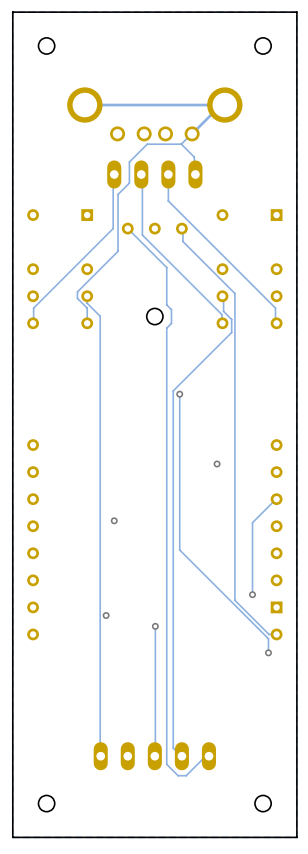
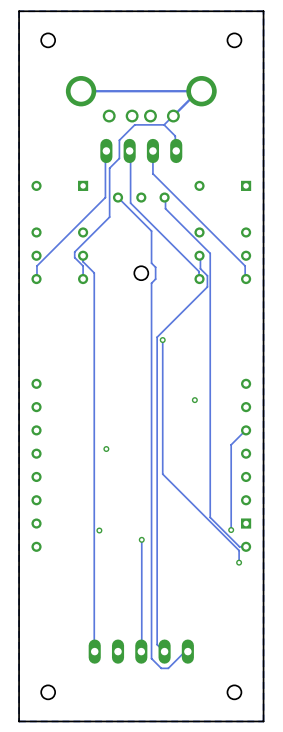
track: (259, 515) (252, 522) (252, 594) -> (231, 444) (231, 530)
via position: (252, 594) -> (231, 530)

